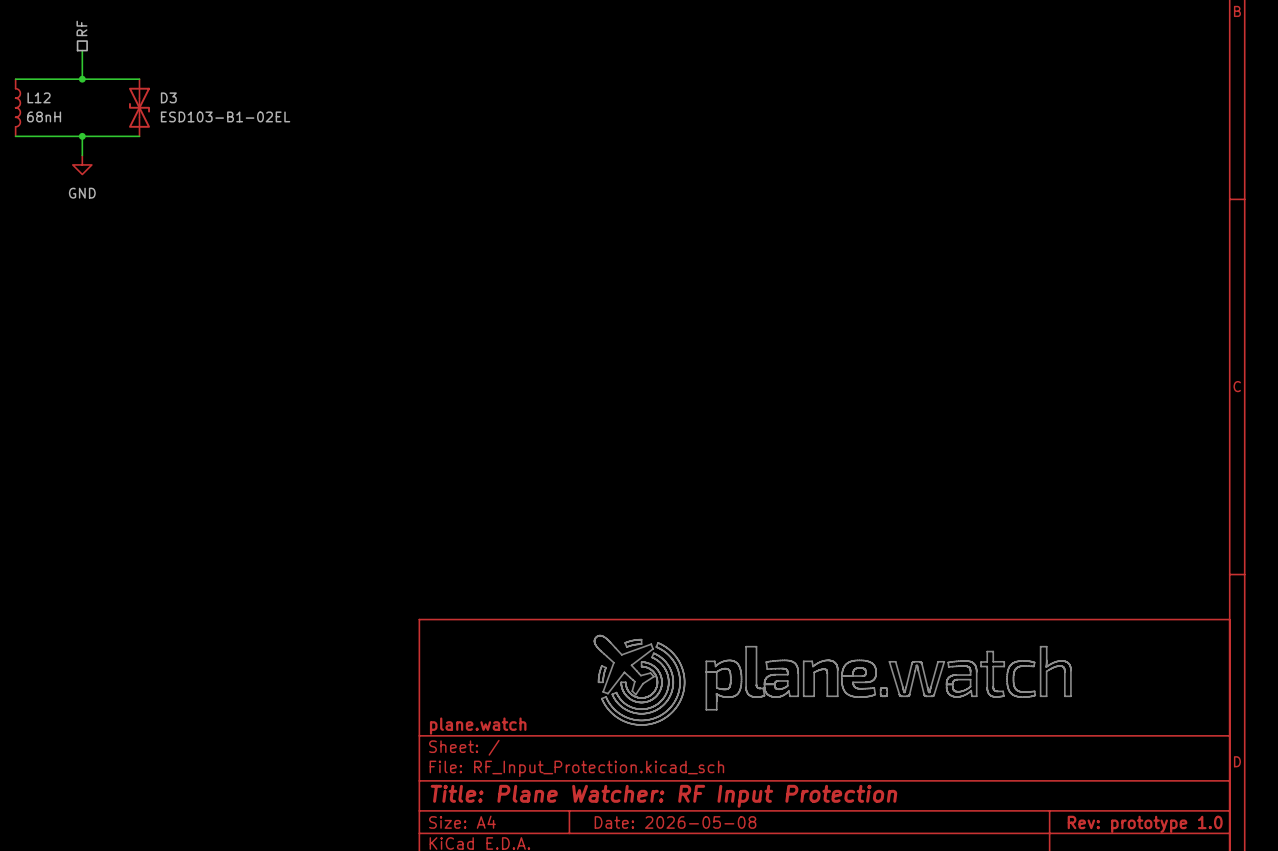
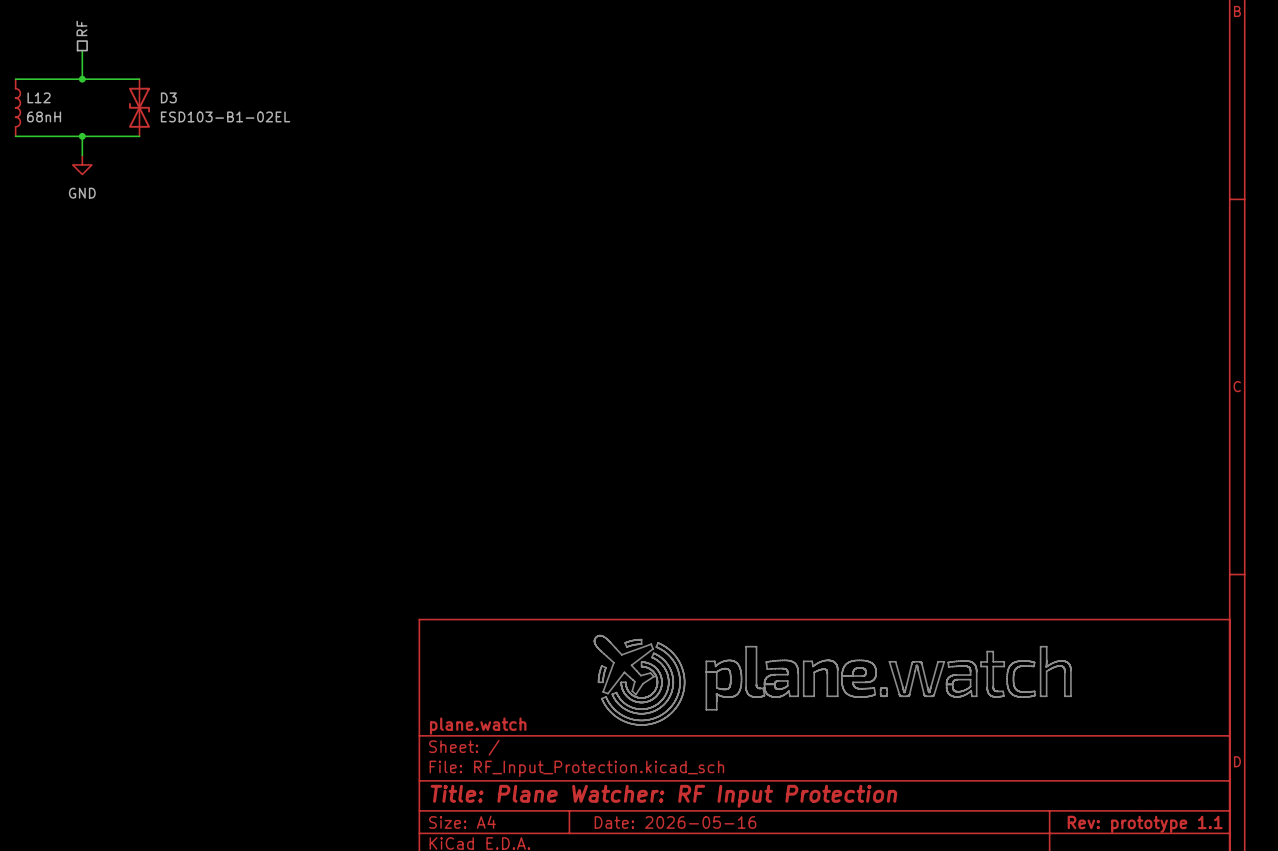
title block: Date: 2026-05-08 (675, 822) -> Date: 2026-05-16 (675, 822)
title block: Rev: prototype 1.0 (1145, 824) -> Rev: prototype 1.1 (1145, 824)

